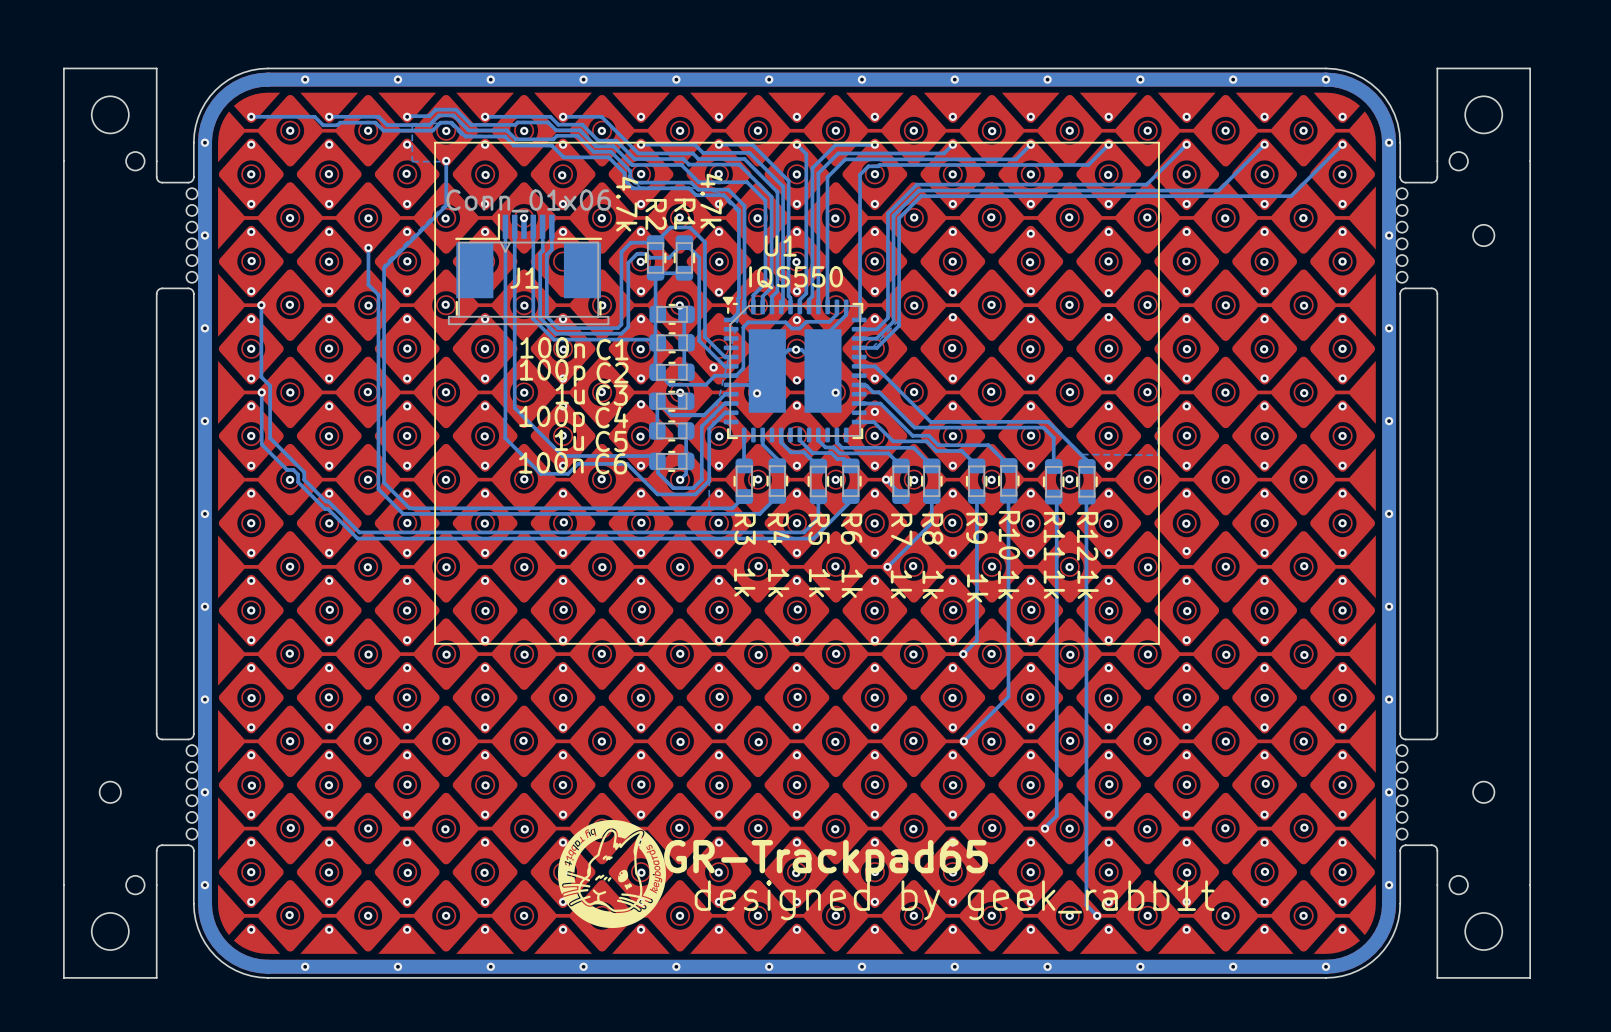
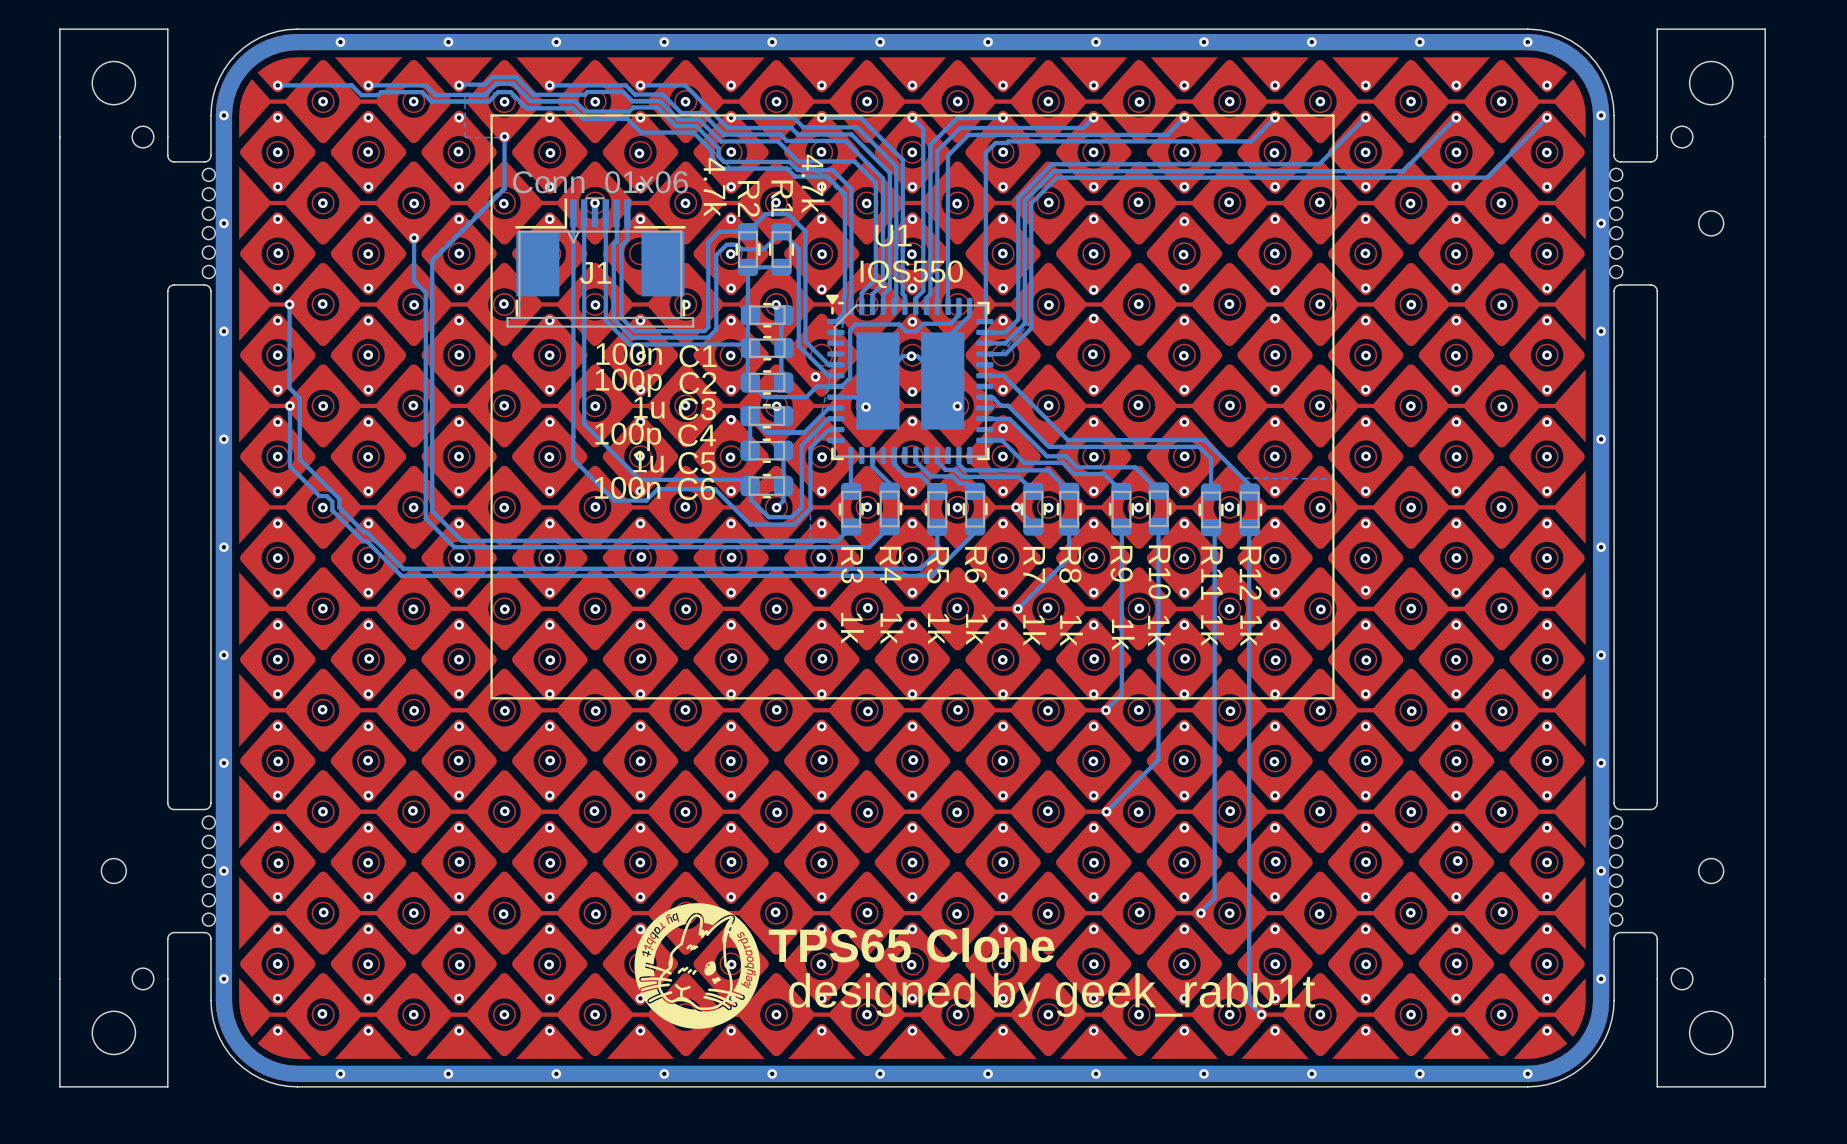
text: none -> TPS65 Clone (911, 945)
text: GR-Trackpad65 (825, 861) -> none

